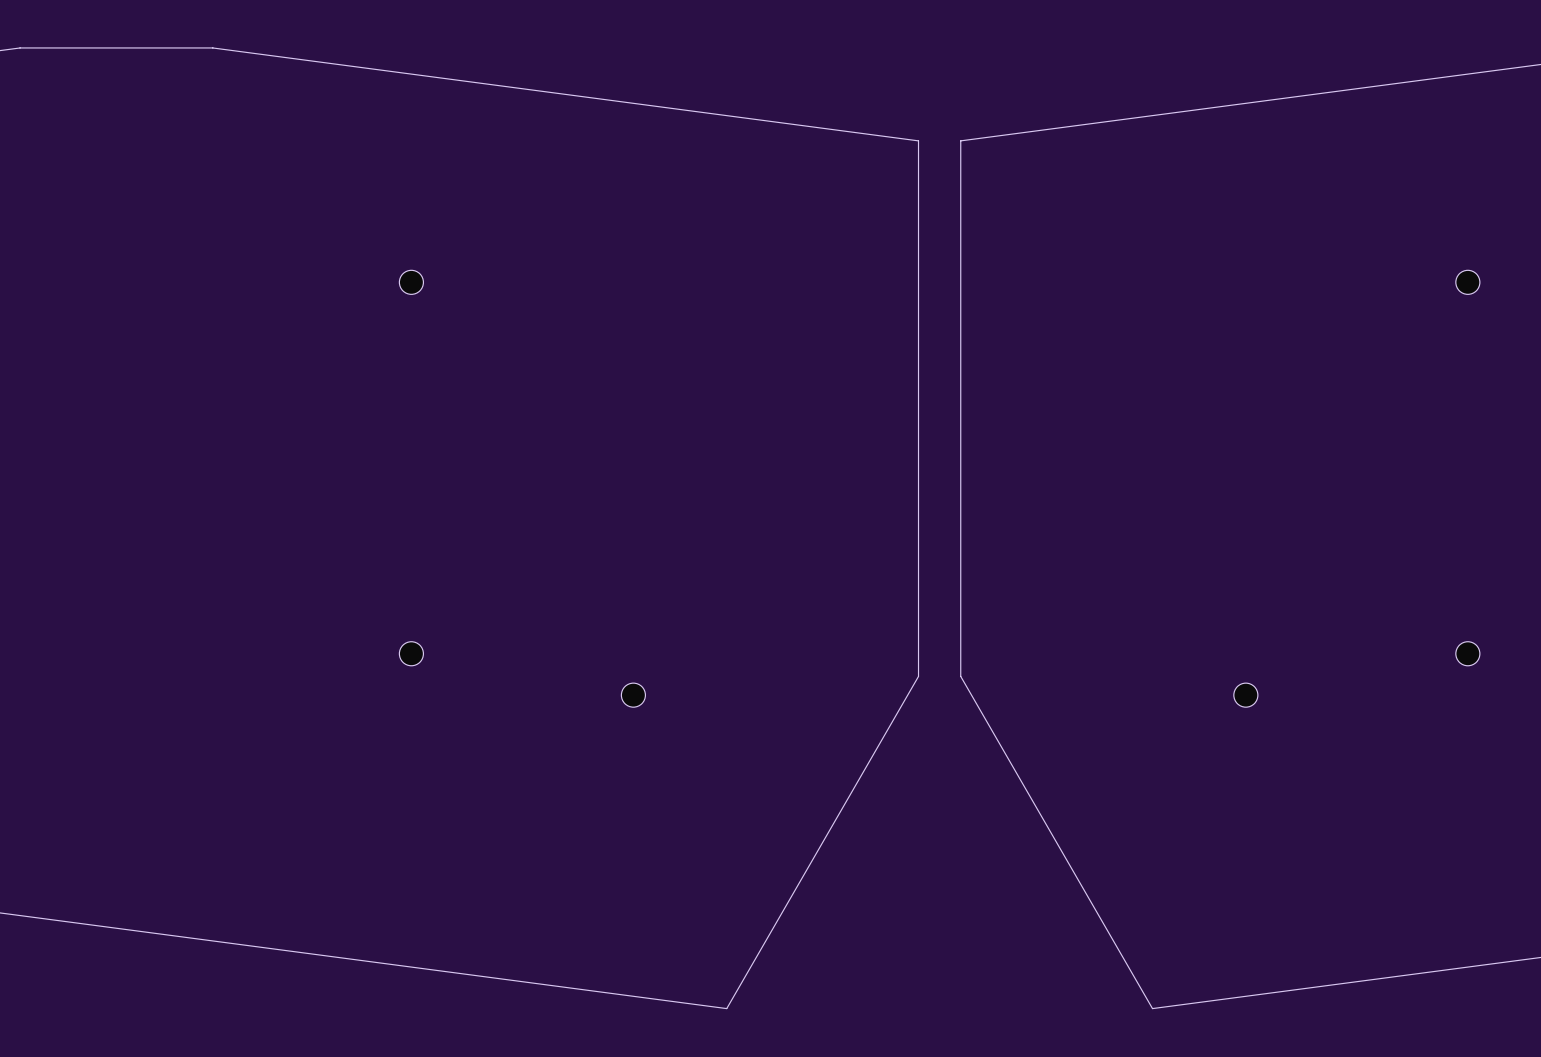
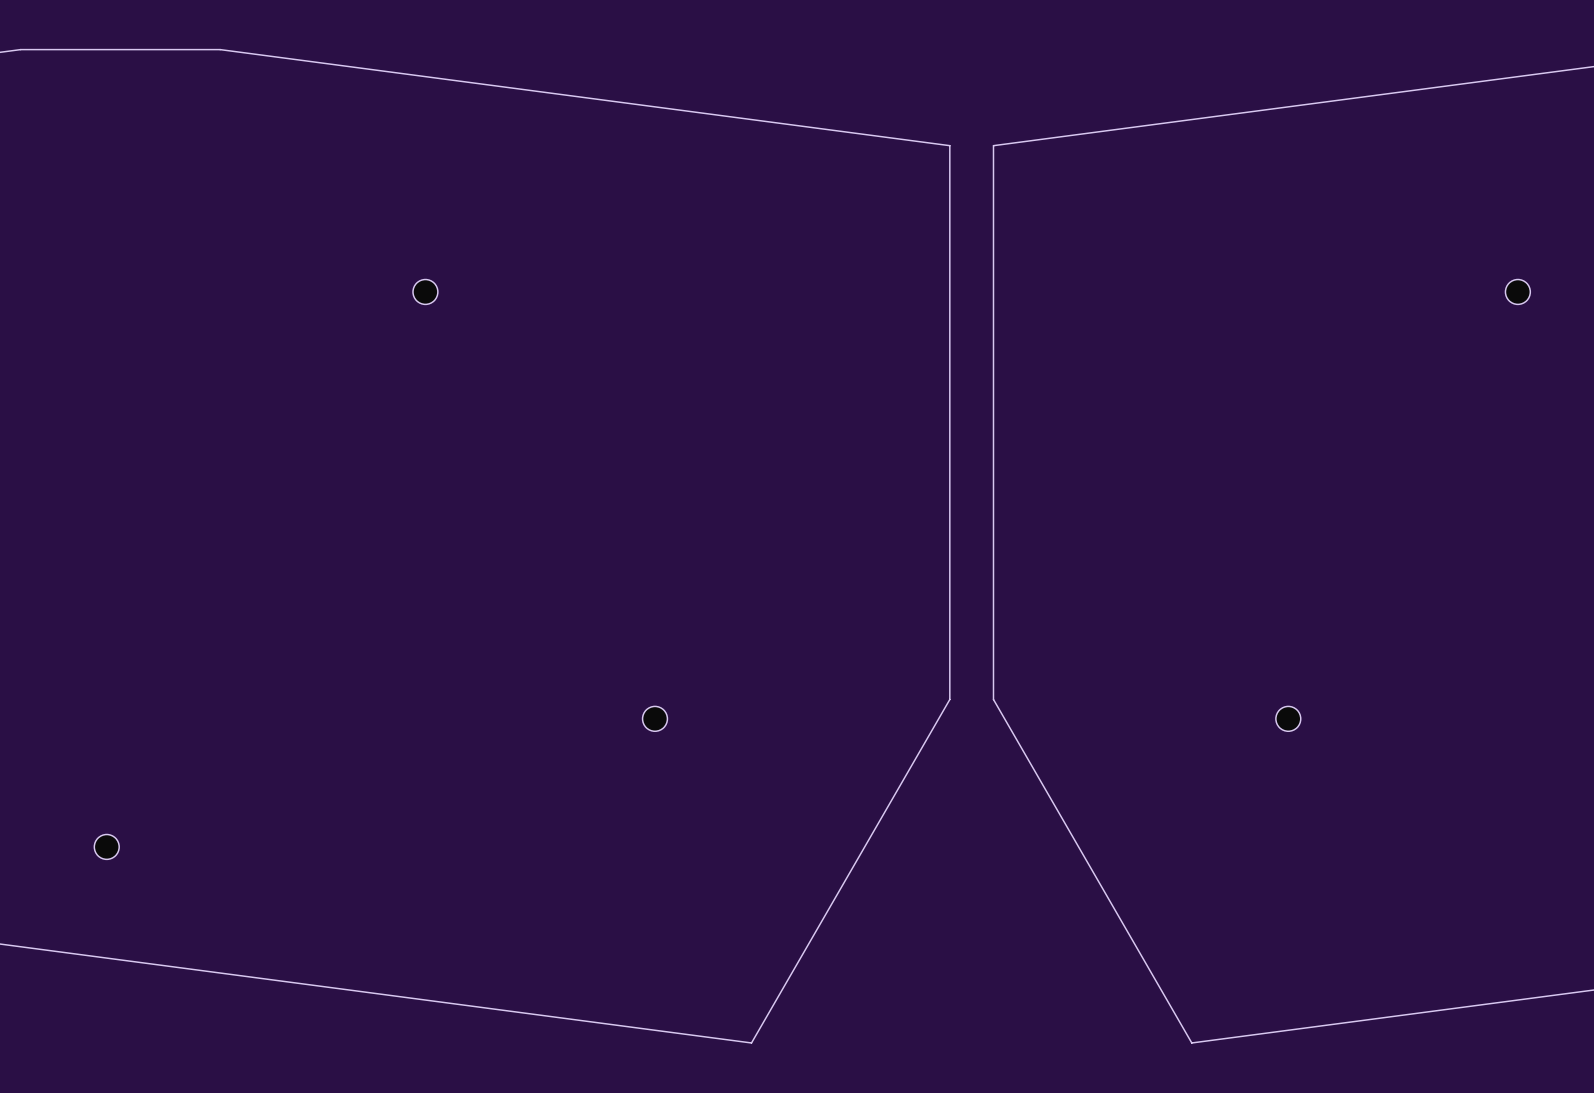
part: (411, 653) -> none
part: (1467, 653) -> none
part: none -> (106, 846)

